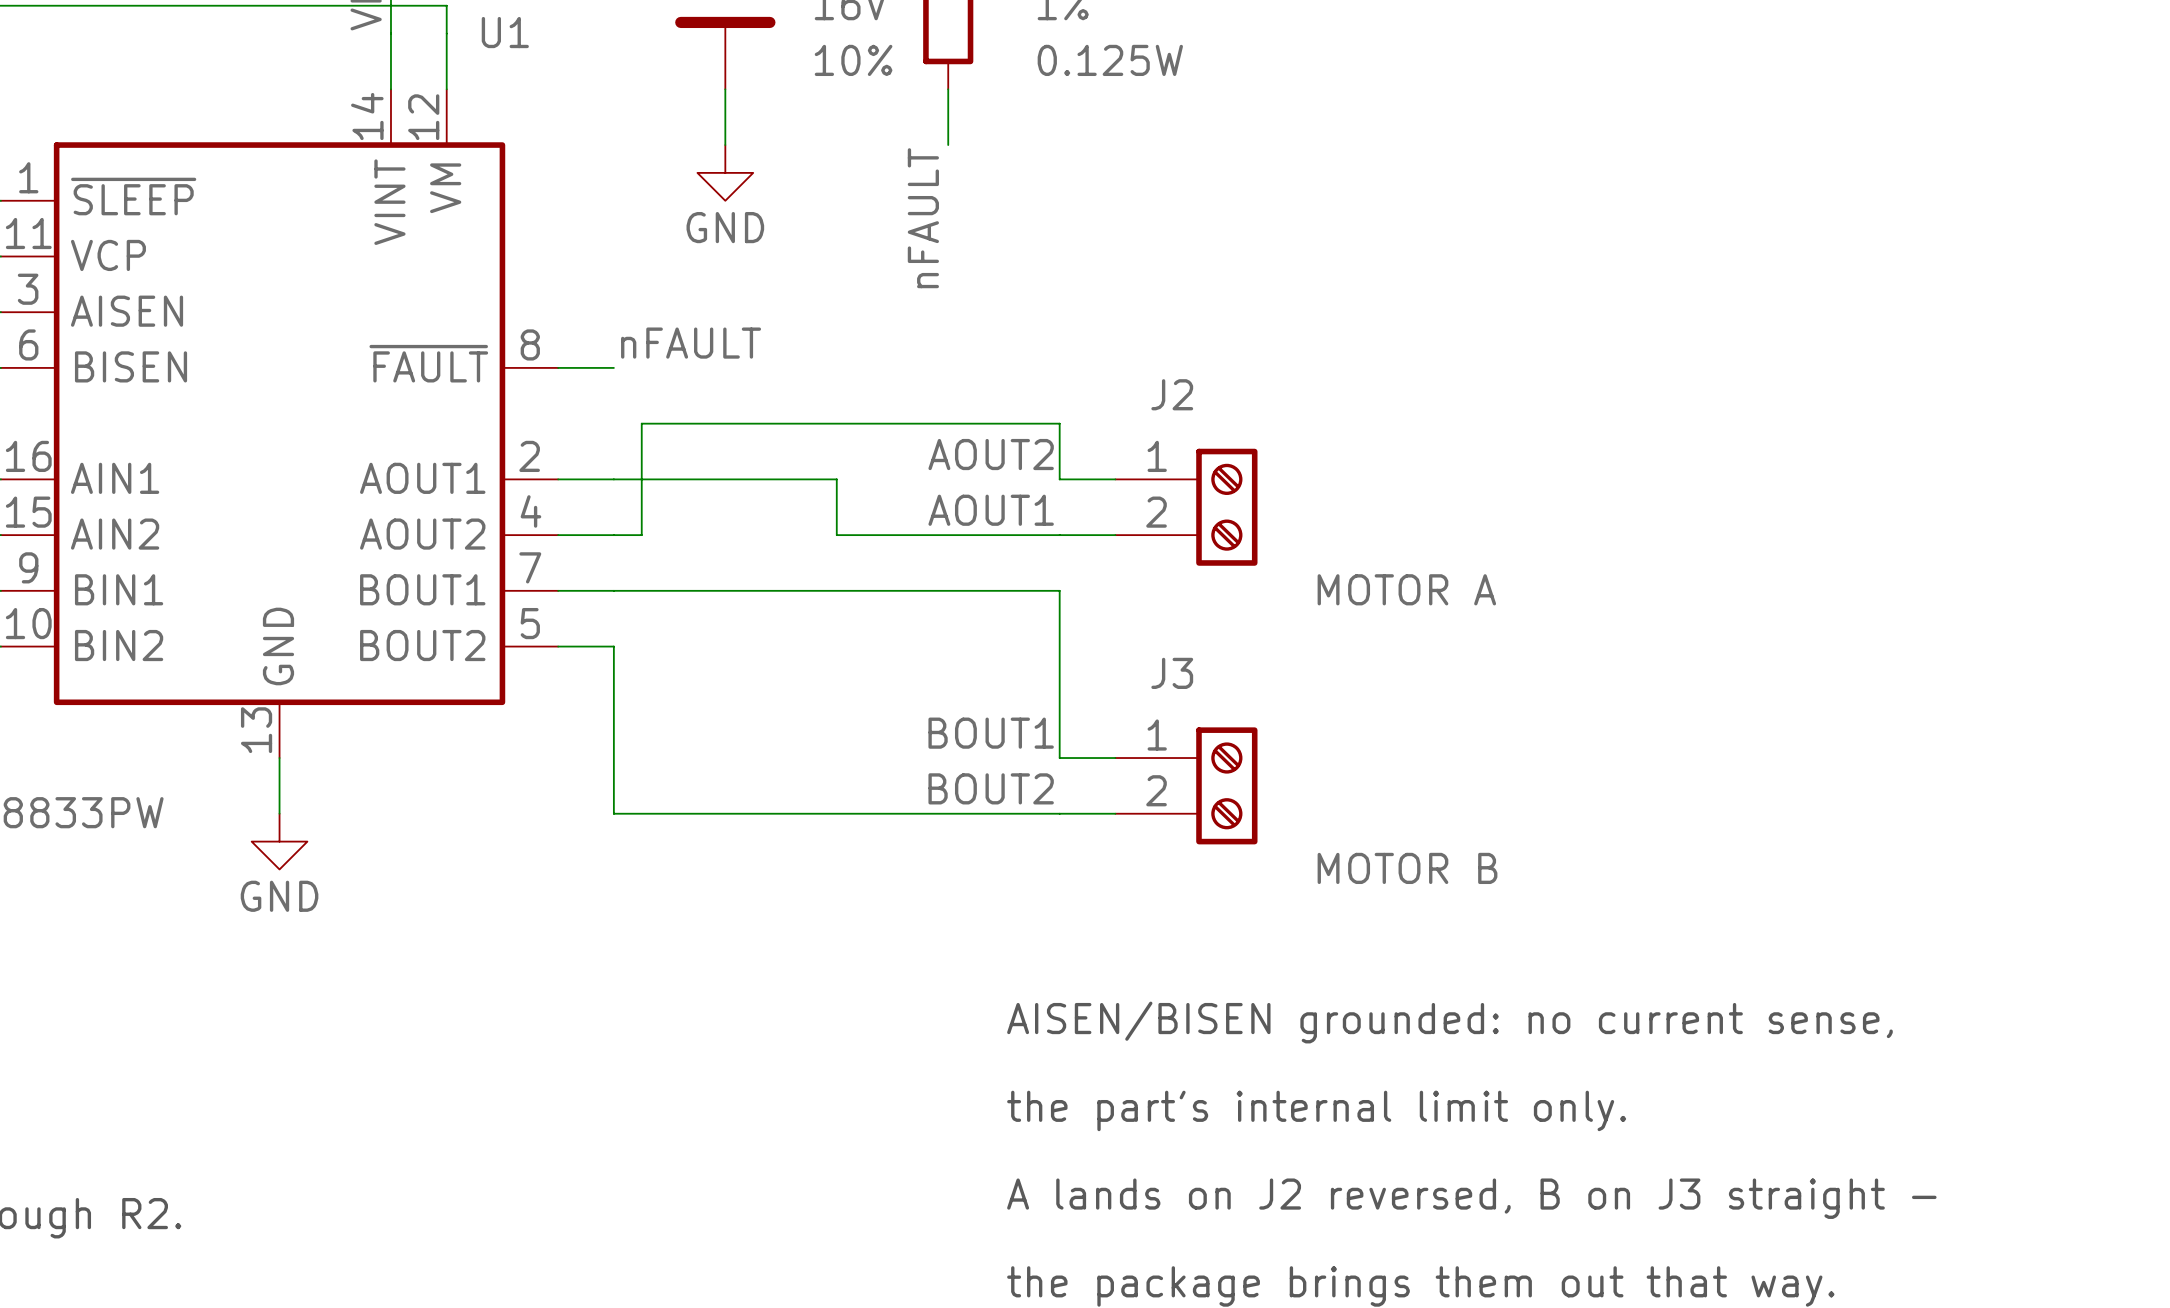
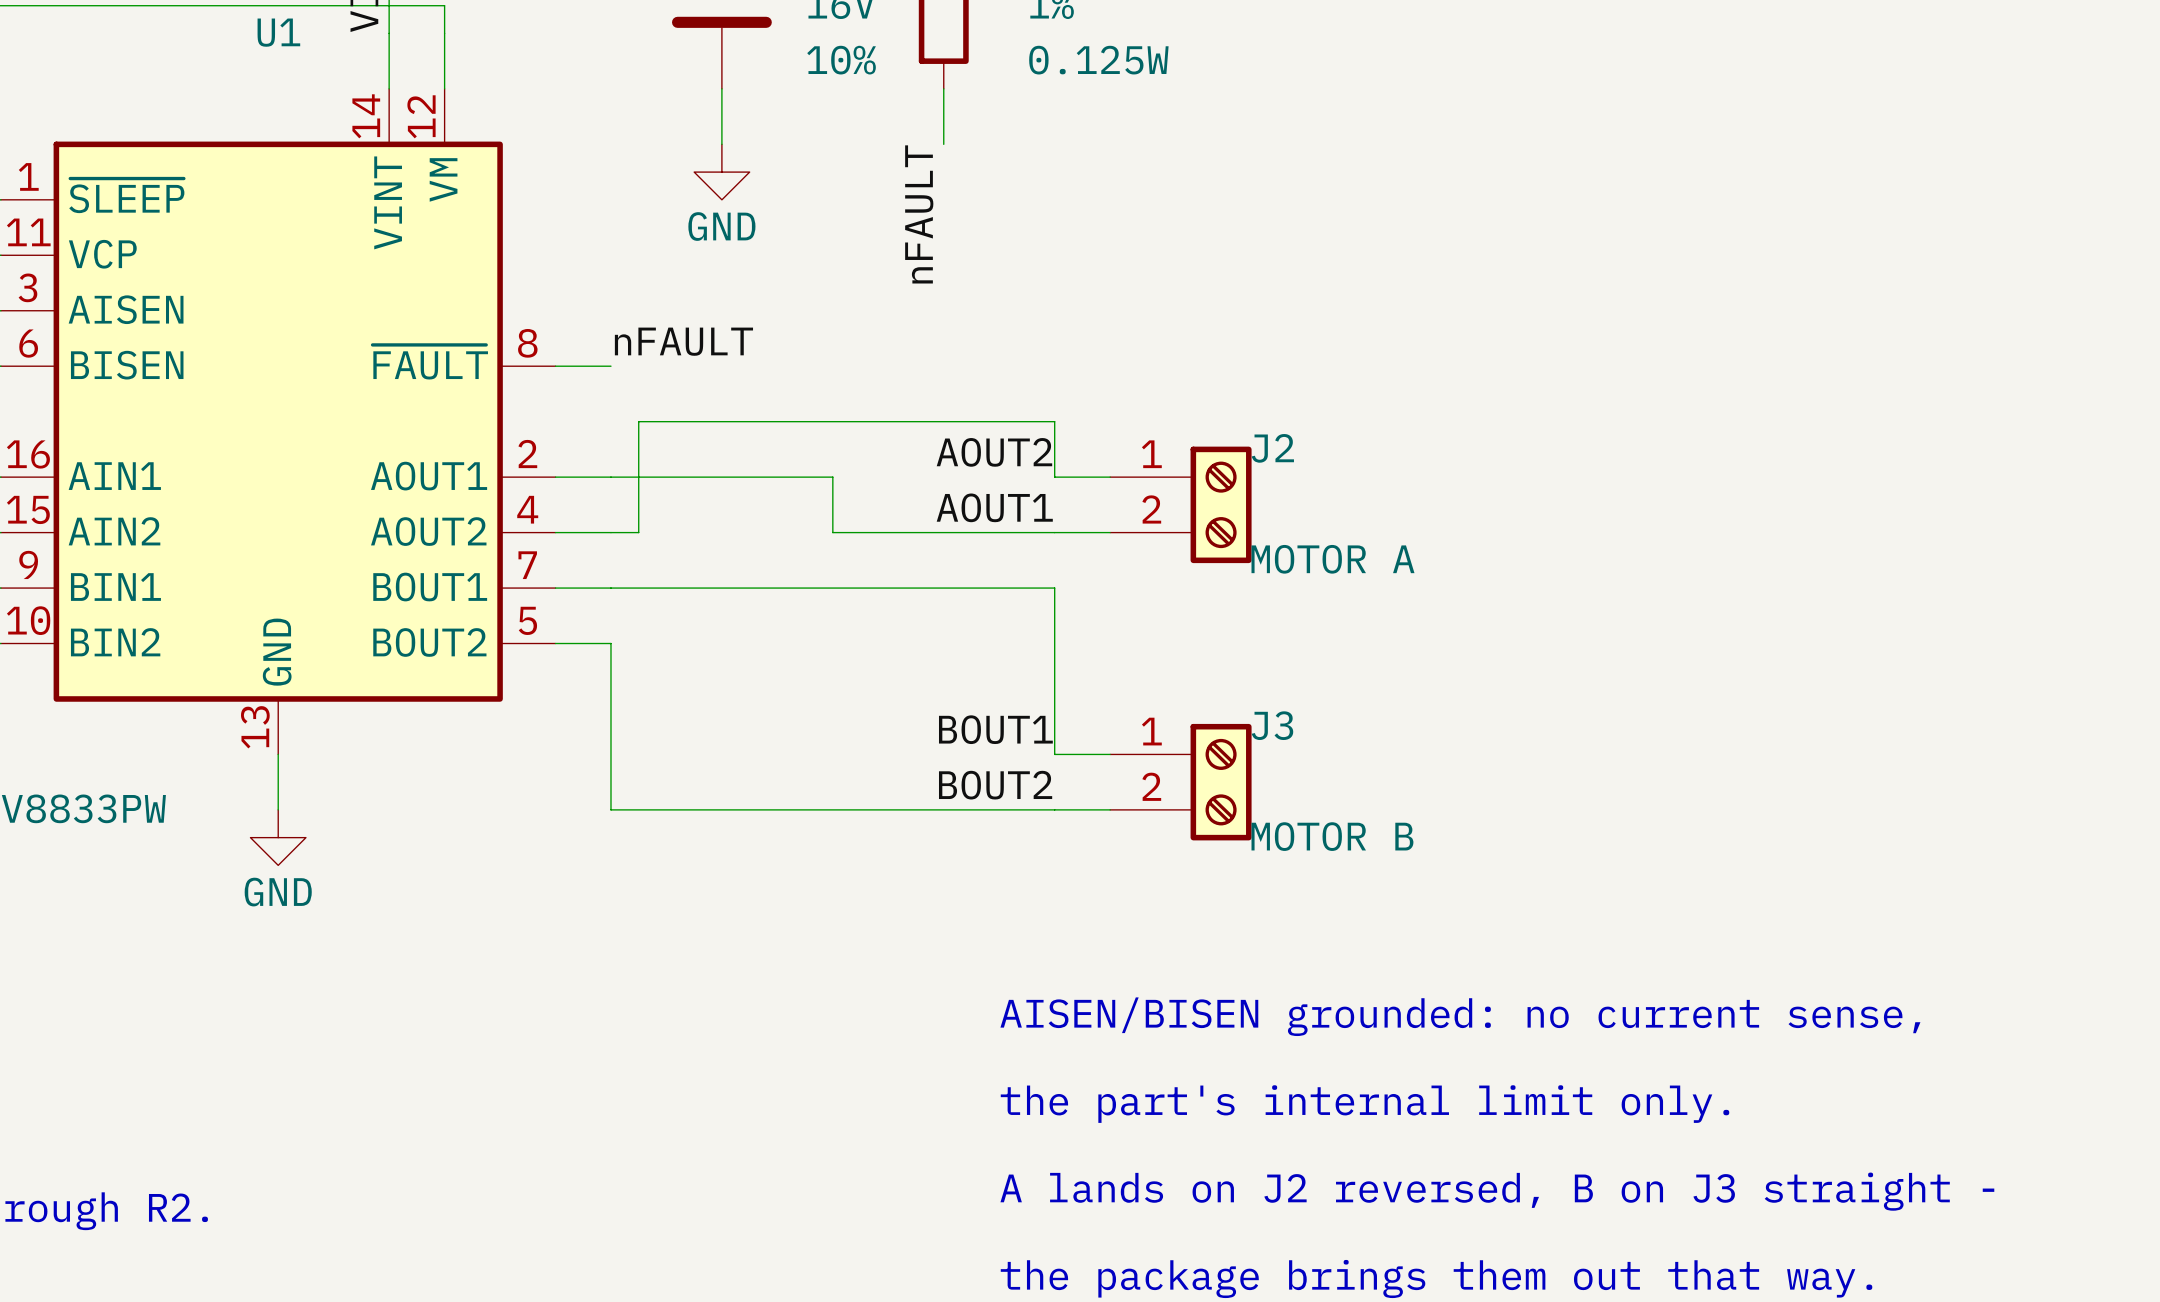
U1 name position: U1 (505, 32) -> U1 (278, 32)
J2 name position: J2 (1172, 394) -> J2 (1272, 448)
J2 value position: MOTOR A (1406, 589) -> MOTOR A (1332, 559)
J3 name position: J3 (1172, 673) -> J3 (1272, 725)
J3 value position: MOTOR B (1407, 868) -> MOTOR B (1332, 836)

